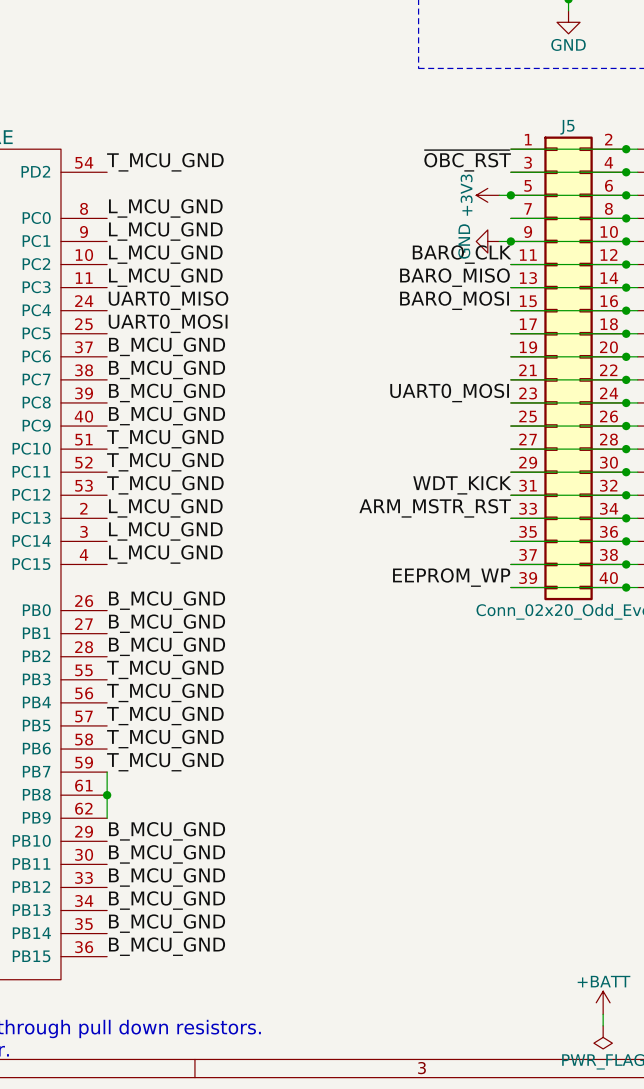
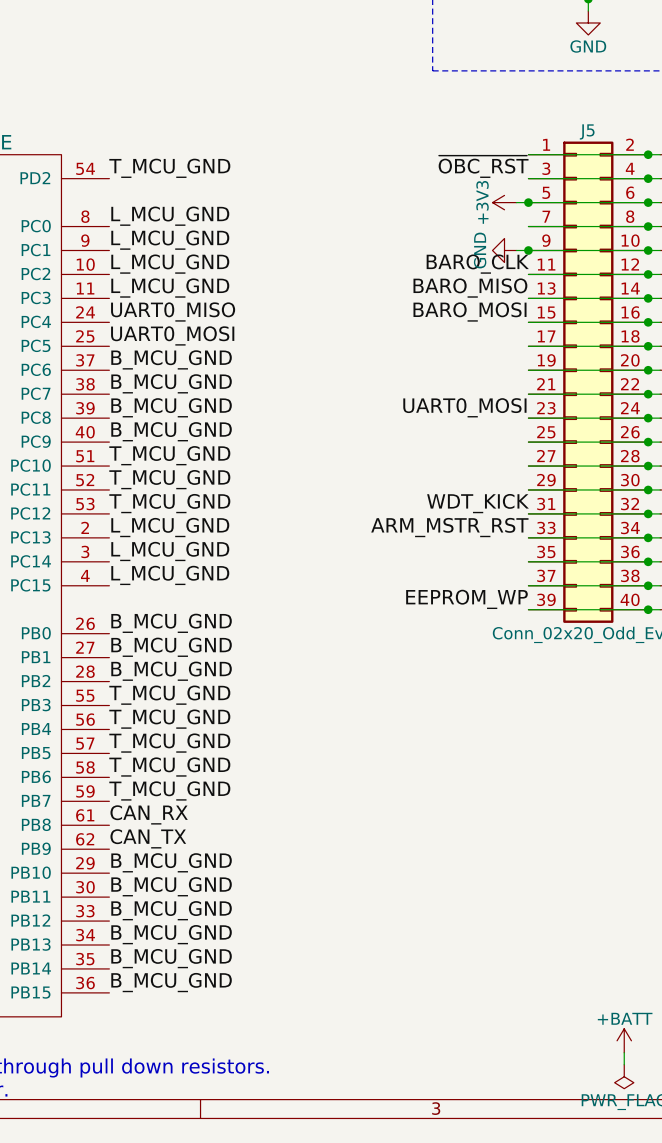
wire: (107, 772) (107, 818) -> none
label: none -> CAN_RX (149, 814)
junction: (107, 795) -> none
label: none -> CAN_TX (148, 838)

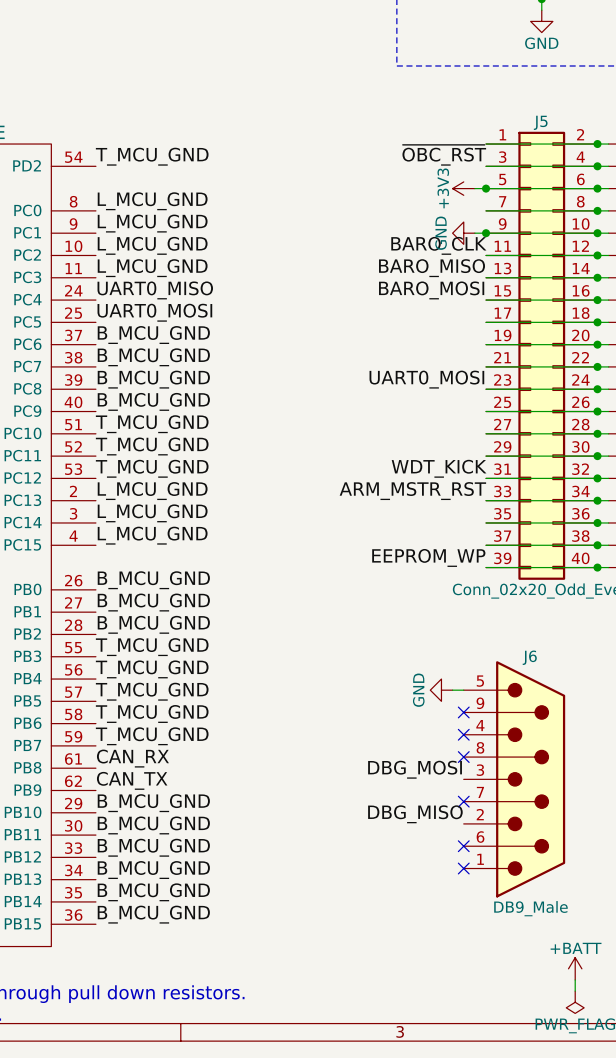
power symbol: none -> GND (441, 690)
wire: none -> (452, 690) (463, 690)
no-connect mark: none -> (463, 712)
no-connect mark: none -> (463, 734)
no-connect mark: none -> (463, 757)
label: none -> DBG_MOSI (415, 769)
J6: none -> DB9_Male (514, 779)
no-connect mark: none -> (463, 801)
label: none -> DBG_MISO (415, 814)
no-connect mark: none -> (463, 846)
no-connect mark: none -> (463, 868)

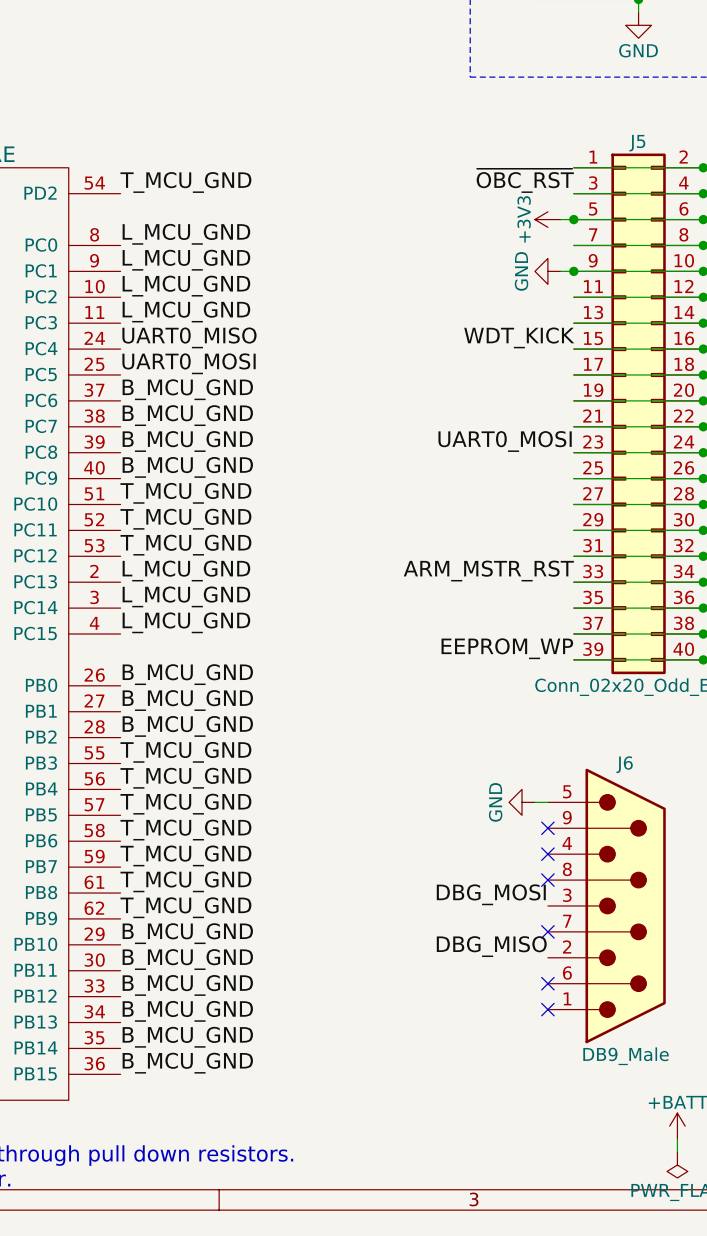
label: BARO_CLK (438, 245) -> none
label: BARO_MISO (432, 268) -> none
label: BARO_MOSI (431, 290) -> WDT_KICK (519, 337)
label: WDT_KICK (439, 468) -> none
label: CAN_RX (132, 758) -> T_MCU_GND (185, 881)
label: CAN_TX (132, 780) -> T_MCU_GND (185, 907)

